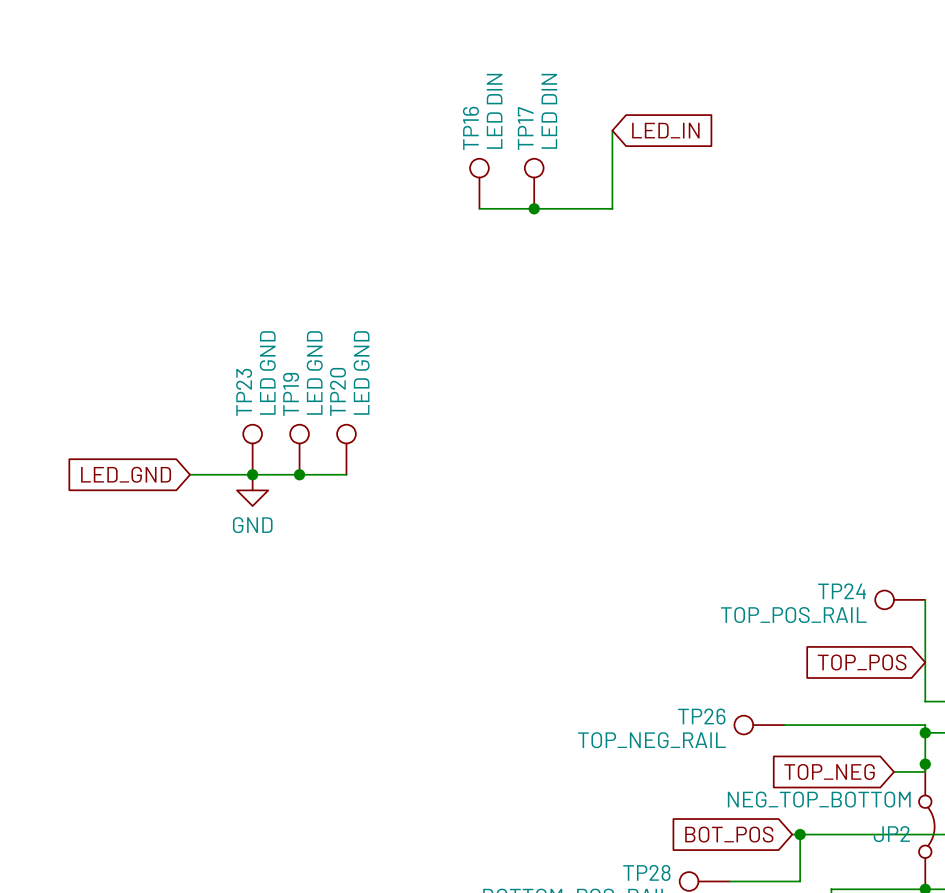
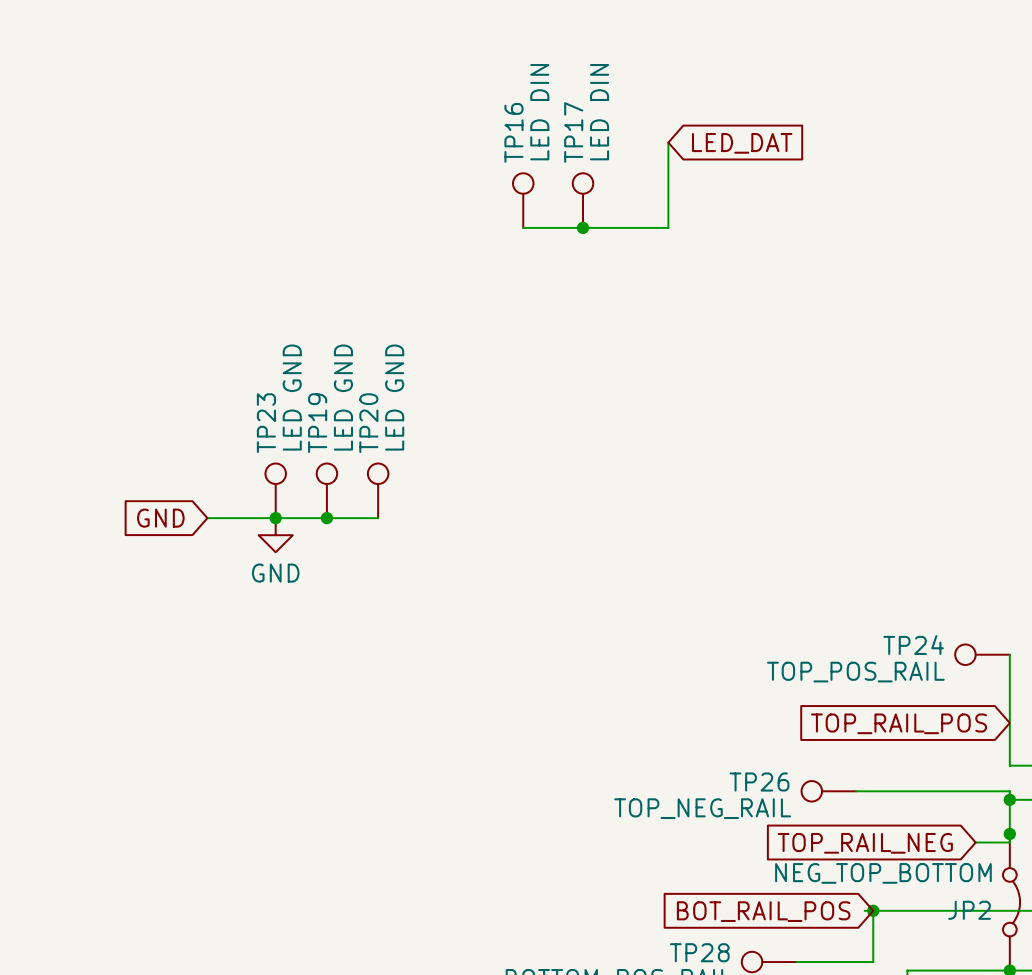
global label: LED_IN (665, 130) -> LED_DAT (742, 143)
global label: LED_GND (126, 474) -> GND (160, 518)
global label: TOP_POS (862, 662) -> TOP_RAIL_POS (899, 723)
global label: TOP_NEG (829, 771) -> TOP_RAIL_NEG (865, 843)
global label: BOT_POS (729, 834) -> BOT_RAIL_POS (763, 911)

